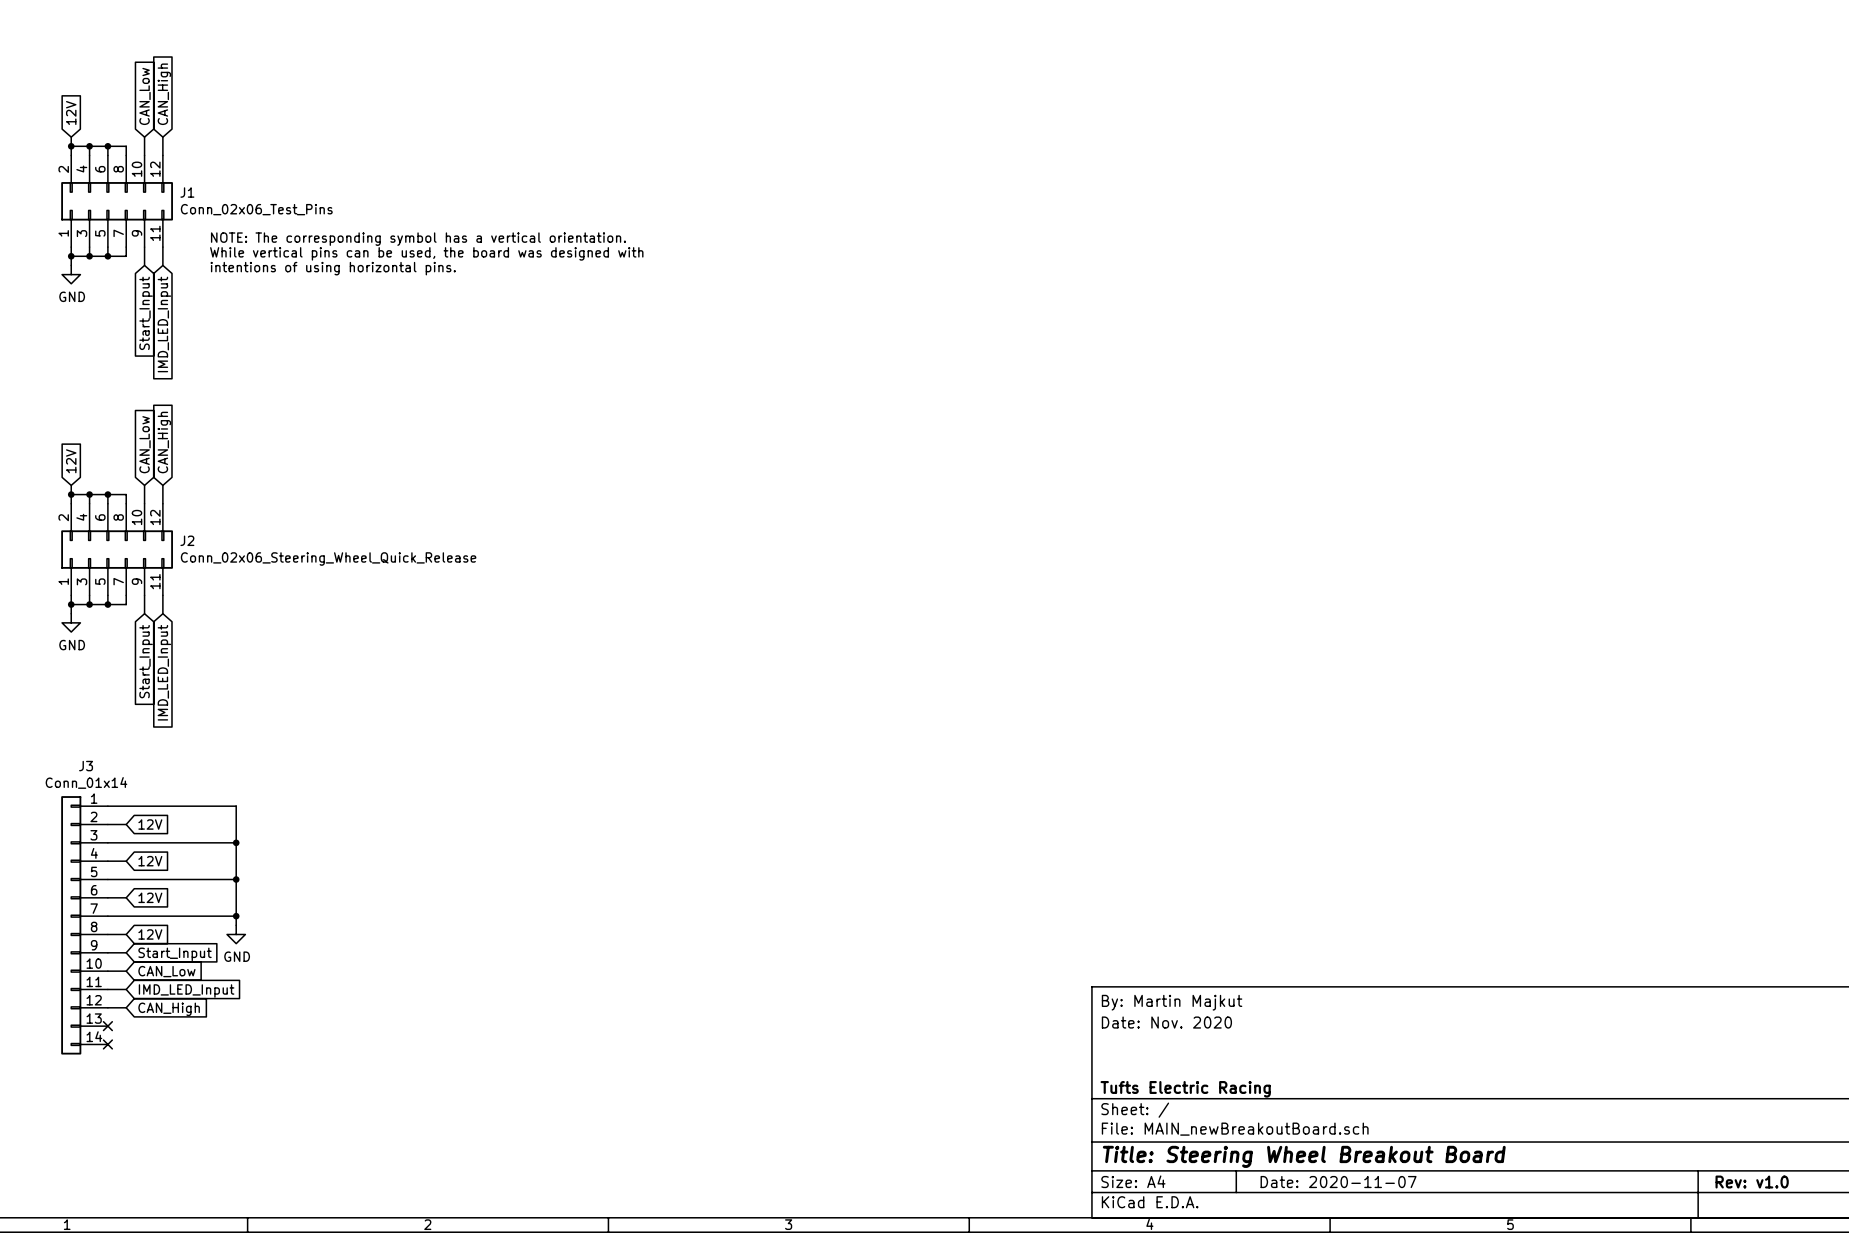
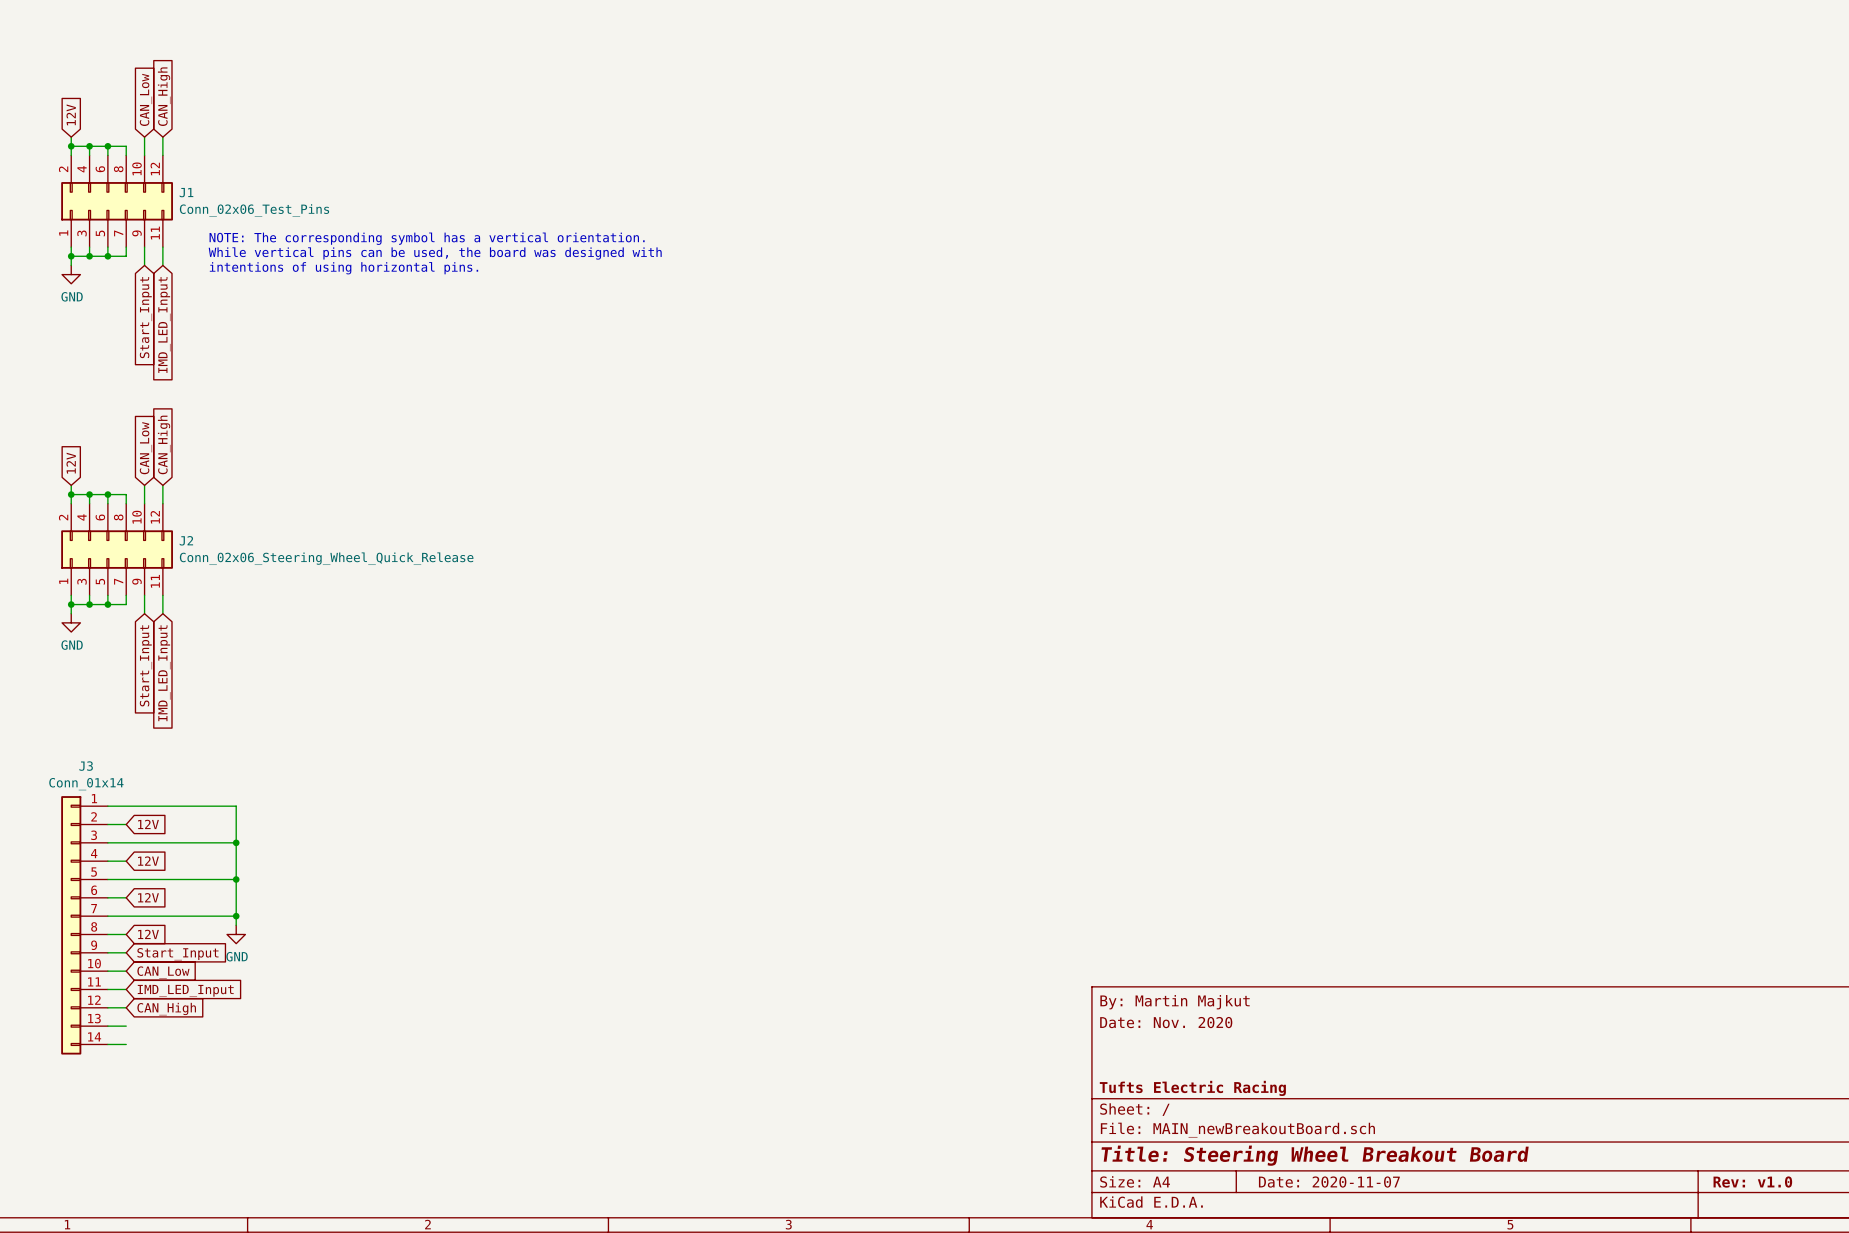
wire: none -> (107, 1026) (126, 1026)
no-connect mark: (107, 1026) -> none
wire: none -> (107, 1044) (126, 1044)
no-connect mark: (107, 1044) -> none

